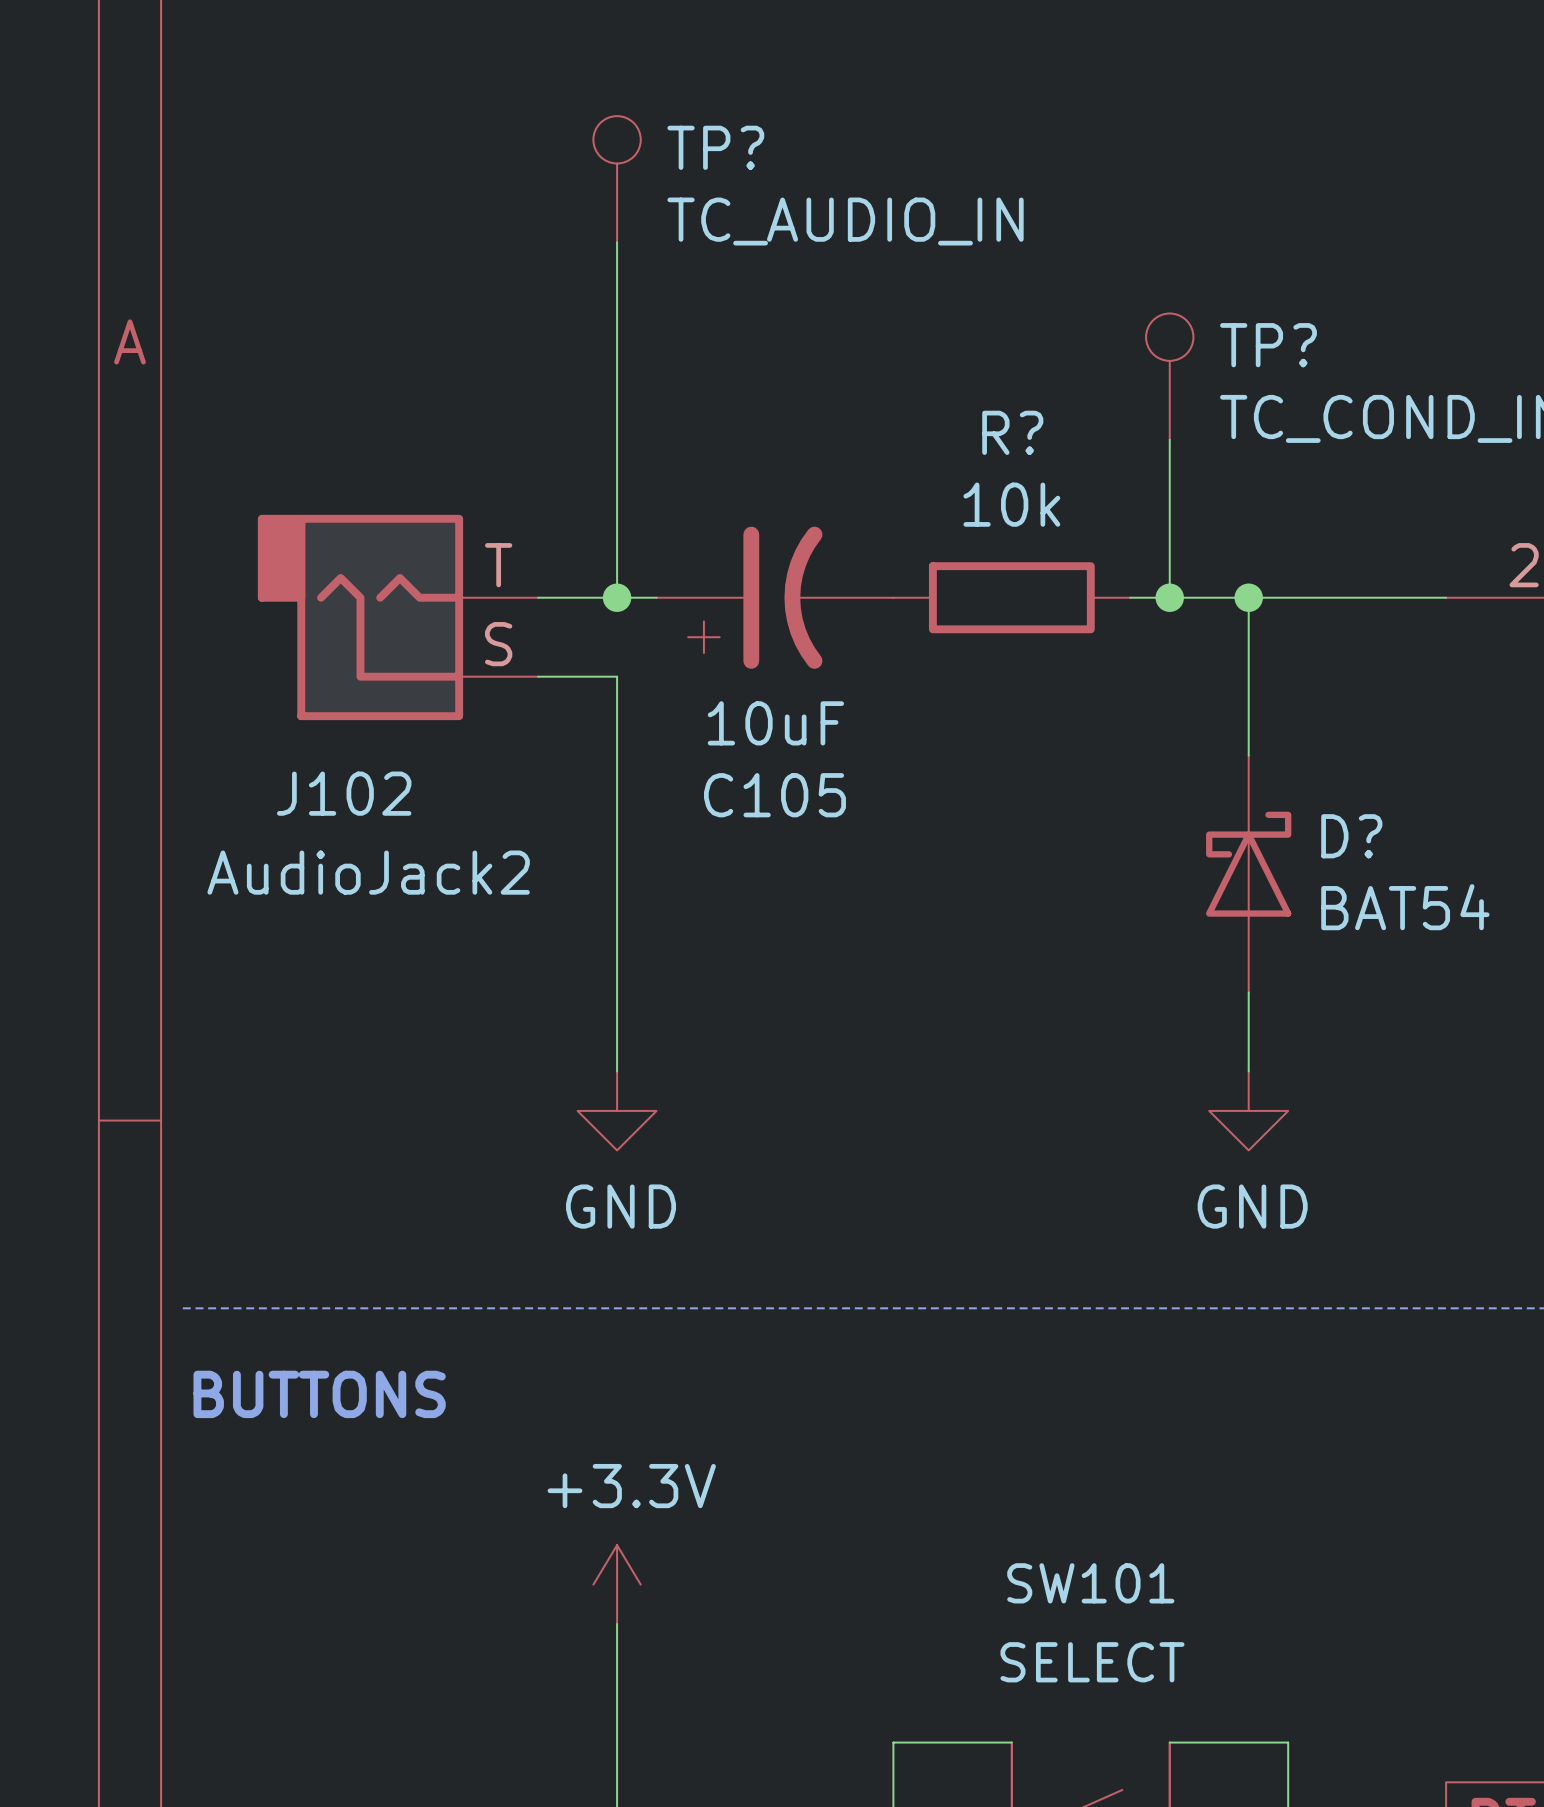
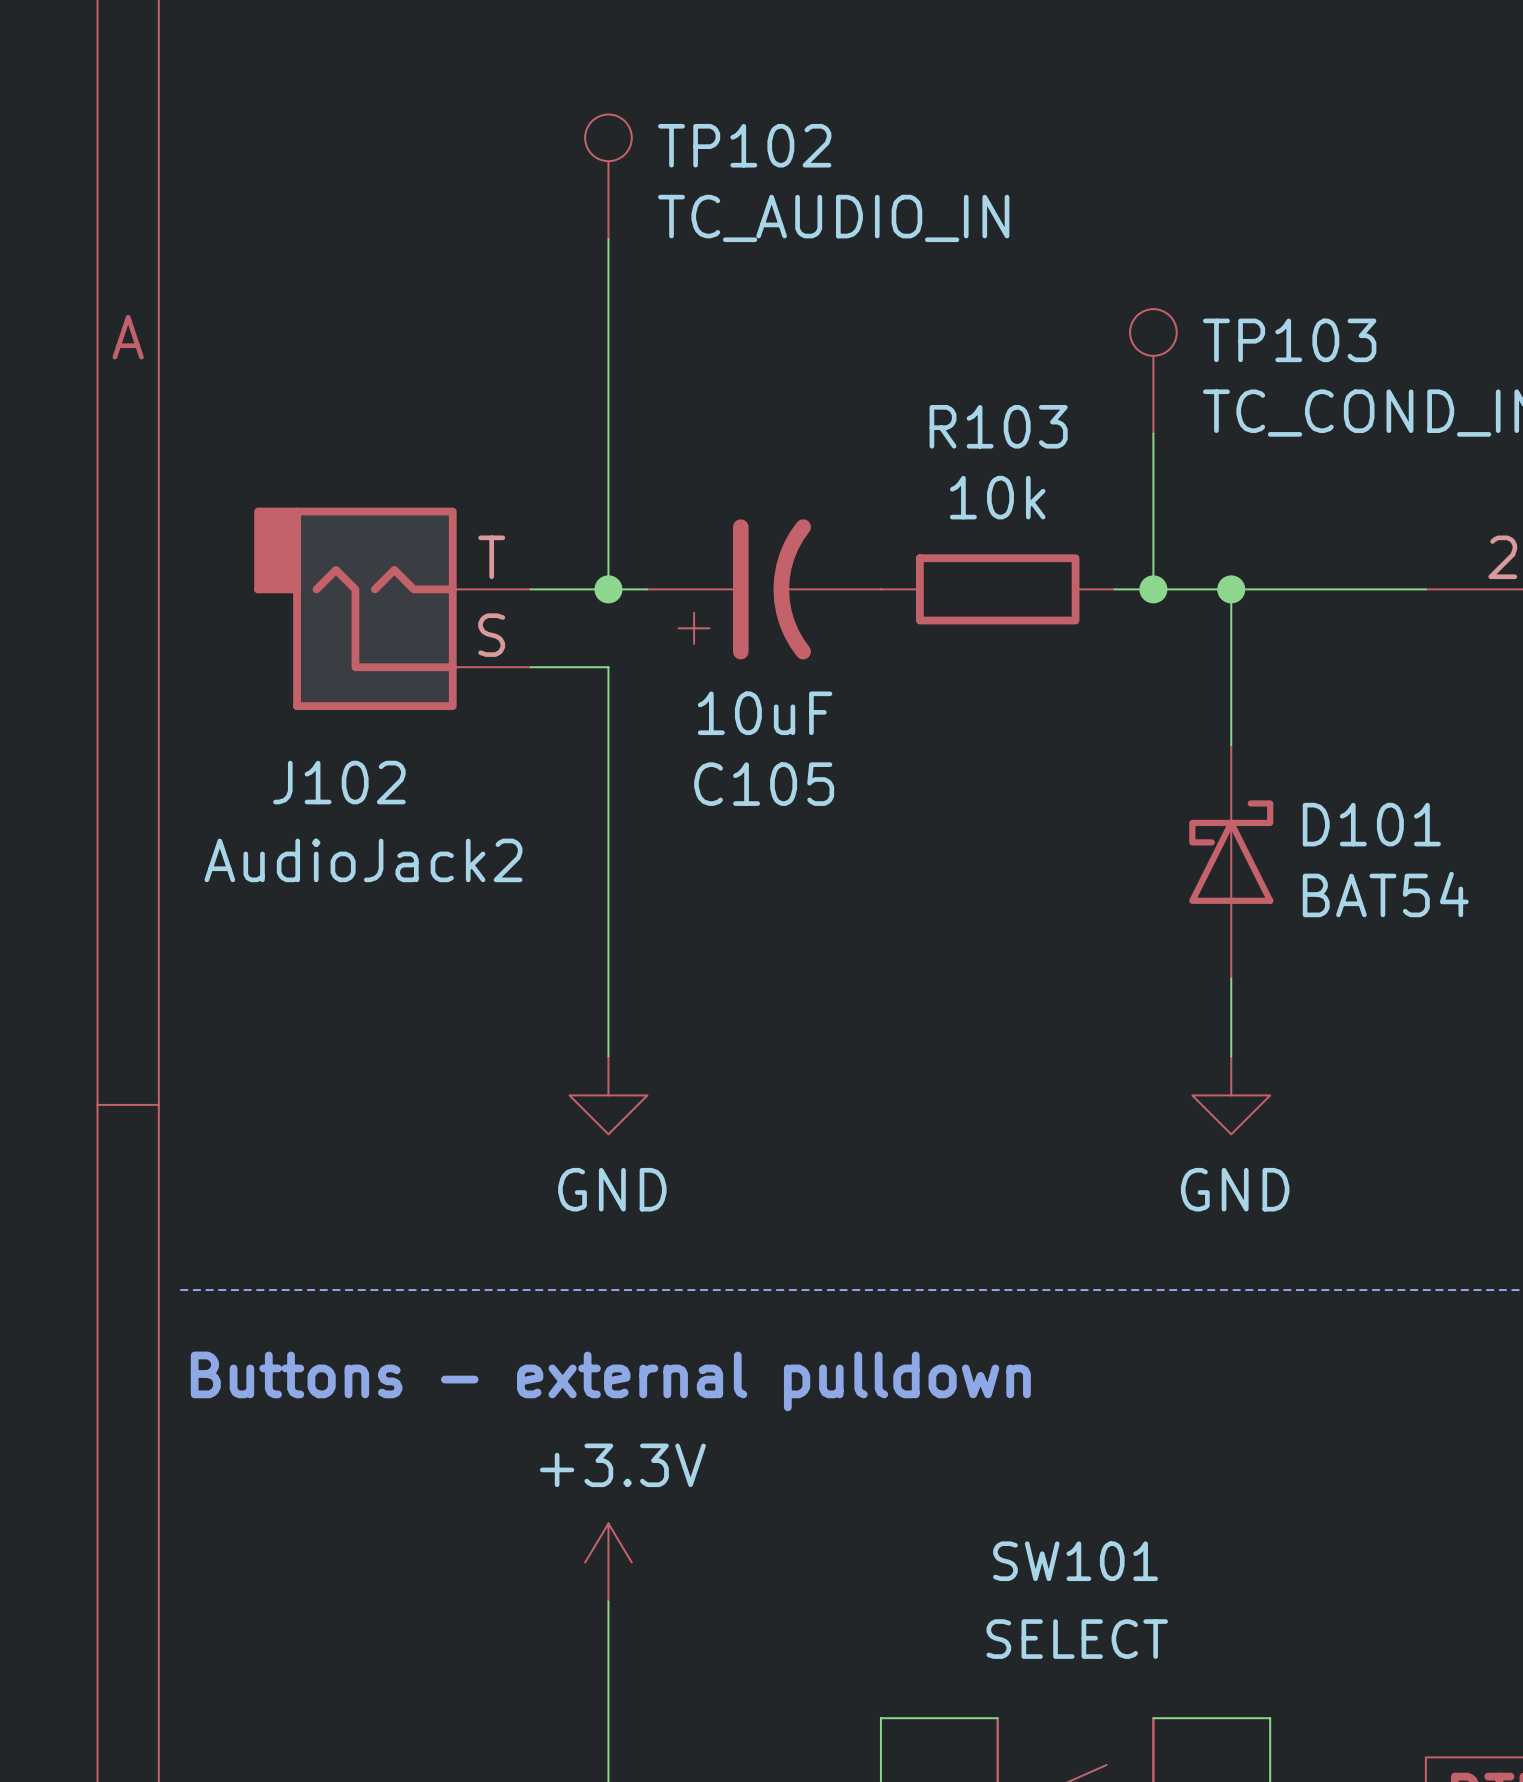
TP? name: TP? (715, 147) -> TP102 (744, 145)
TP? name: TP? (1268, 345) -> TP103 (1289, 340)
R? name: R? (1012, 432) -> R103 (998, 426)
D? name: D? (1351, 836) -> D101 (1371, 824)
text: BUTTONS (319, 1394) -> Buttons - external pulldown (610, 1381)

